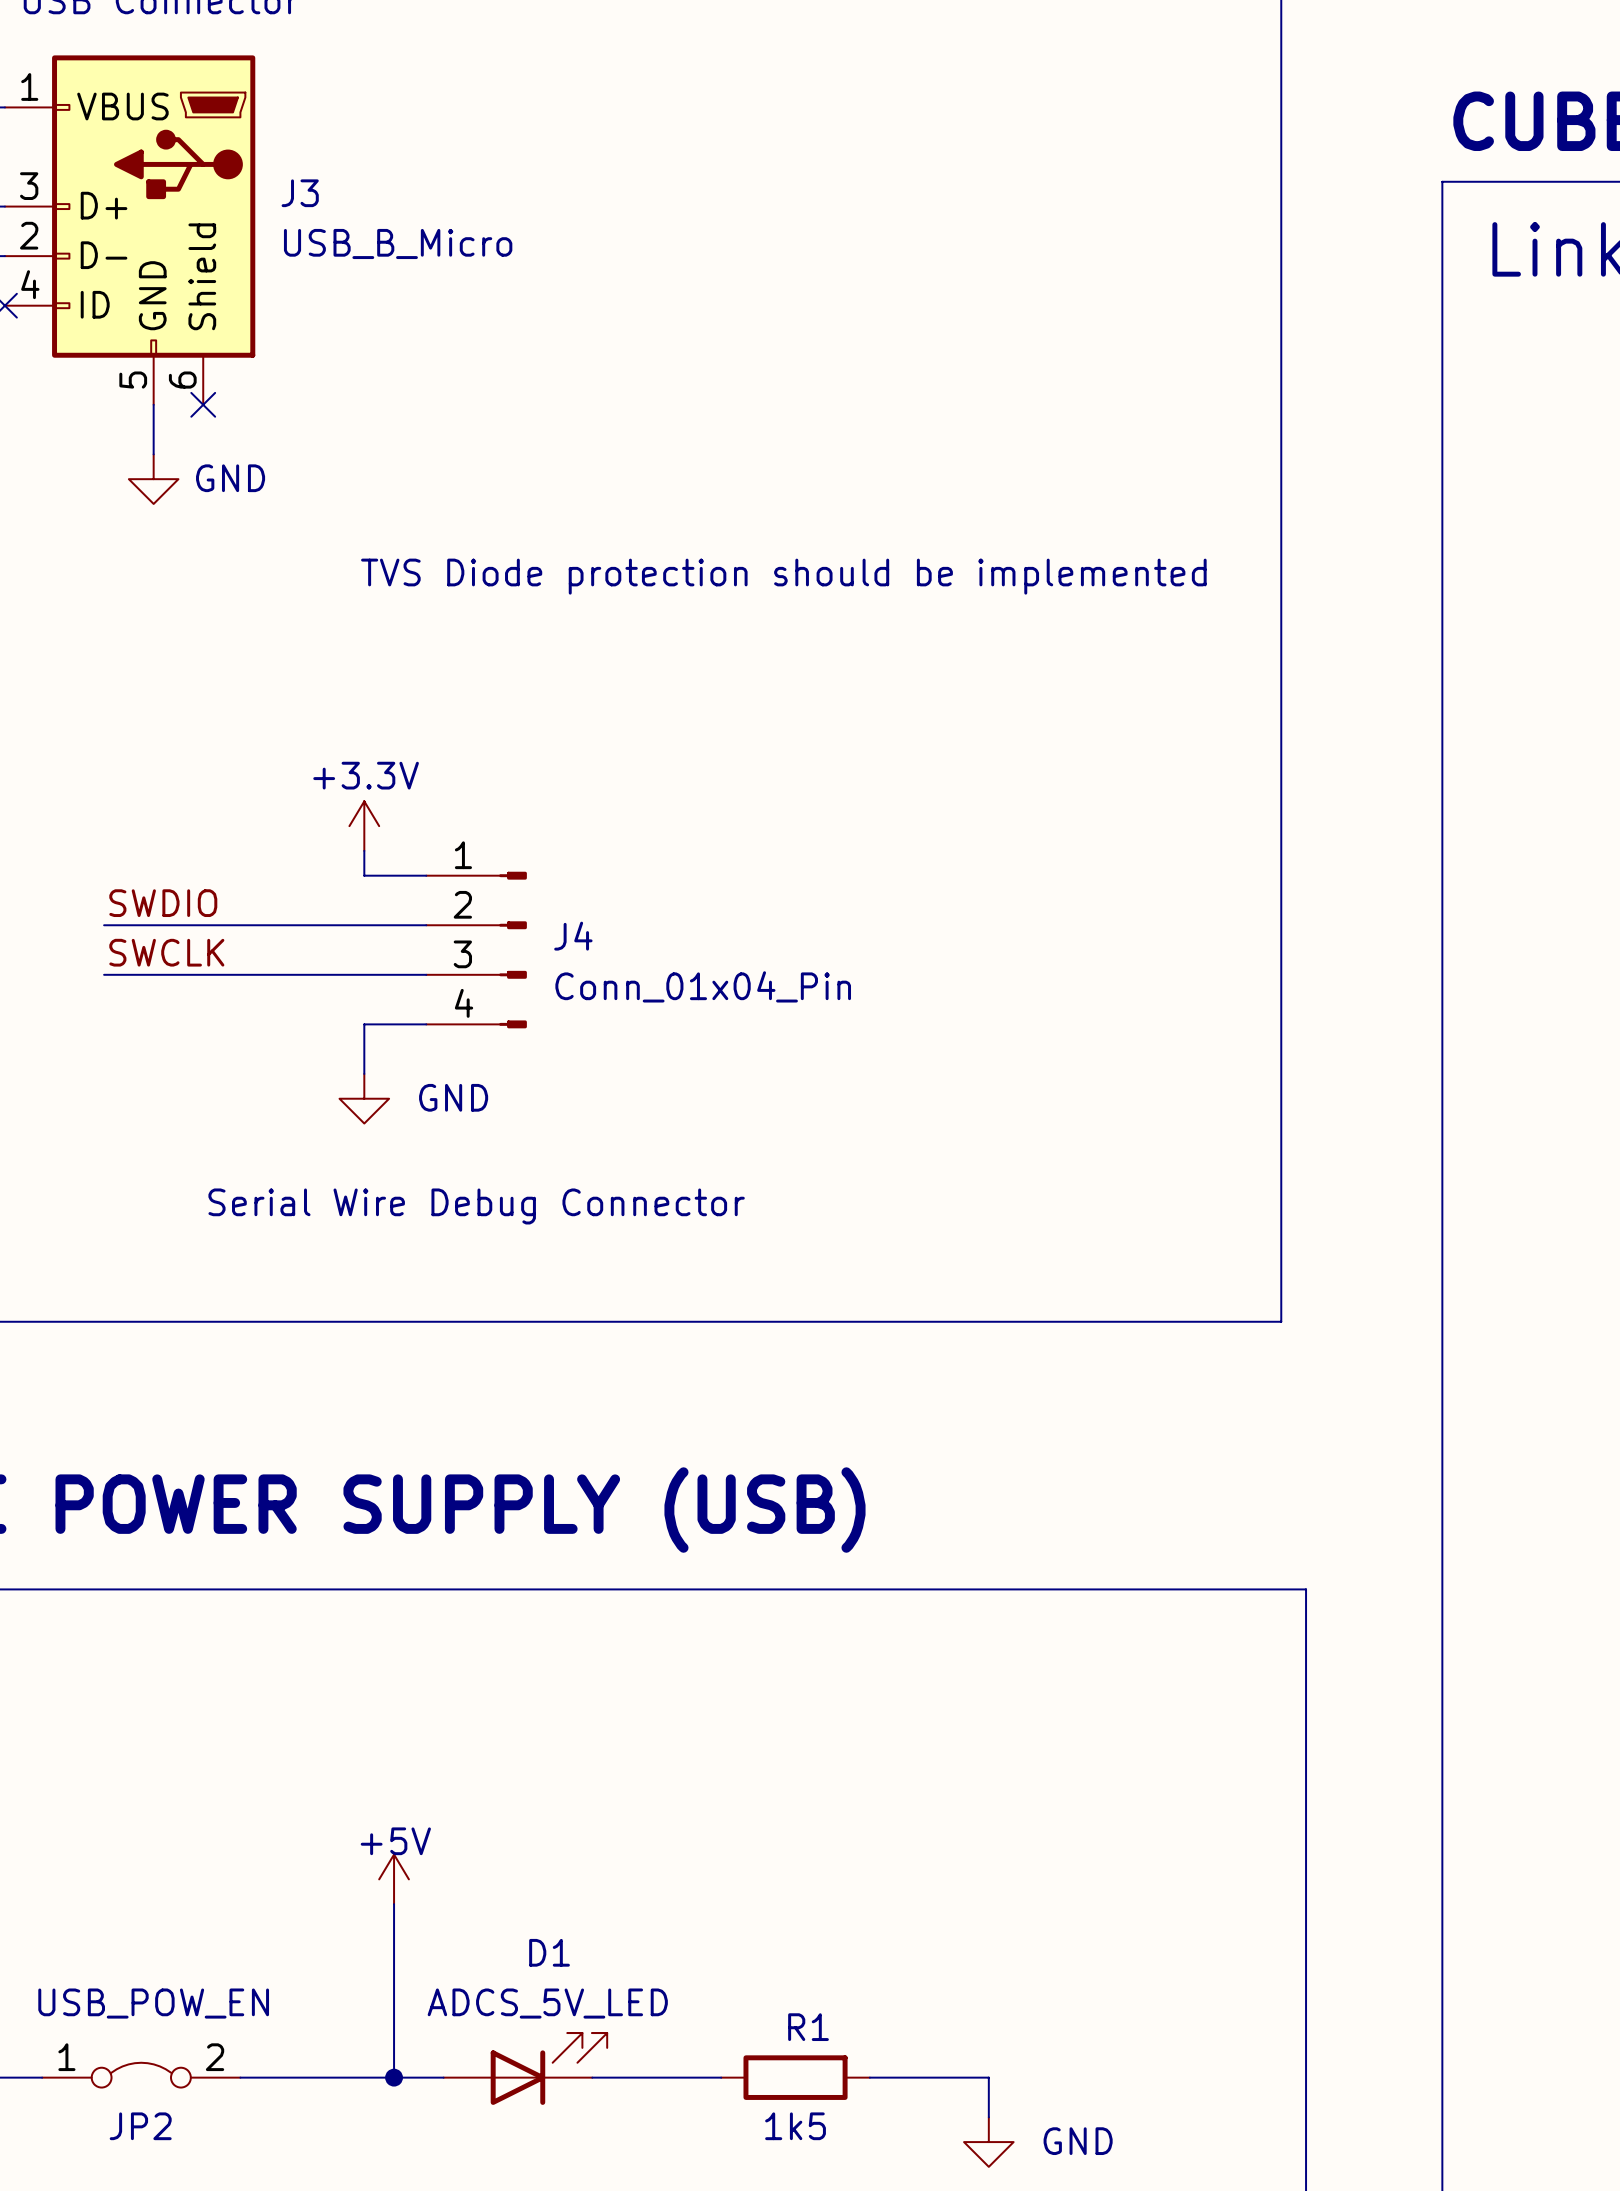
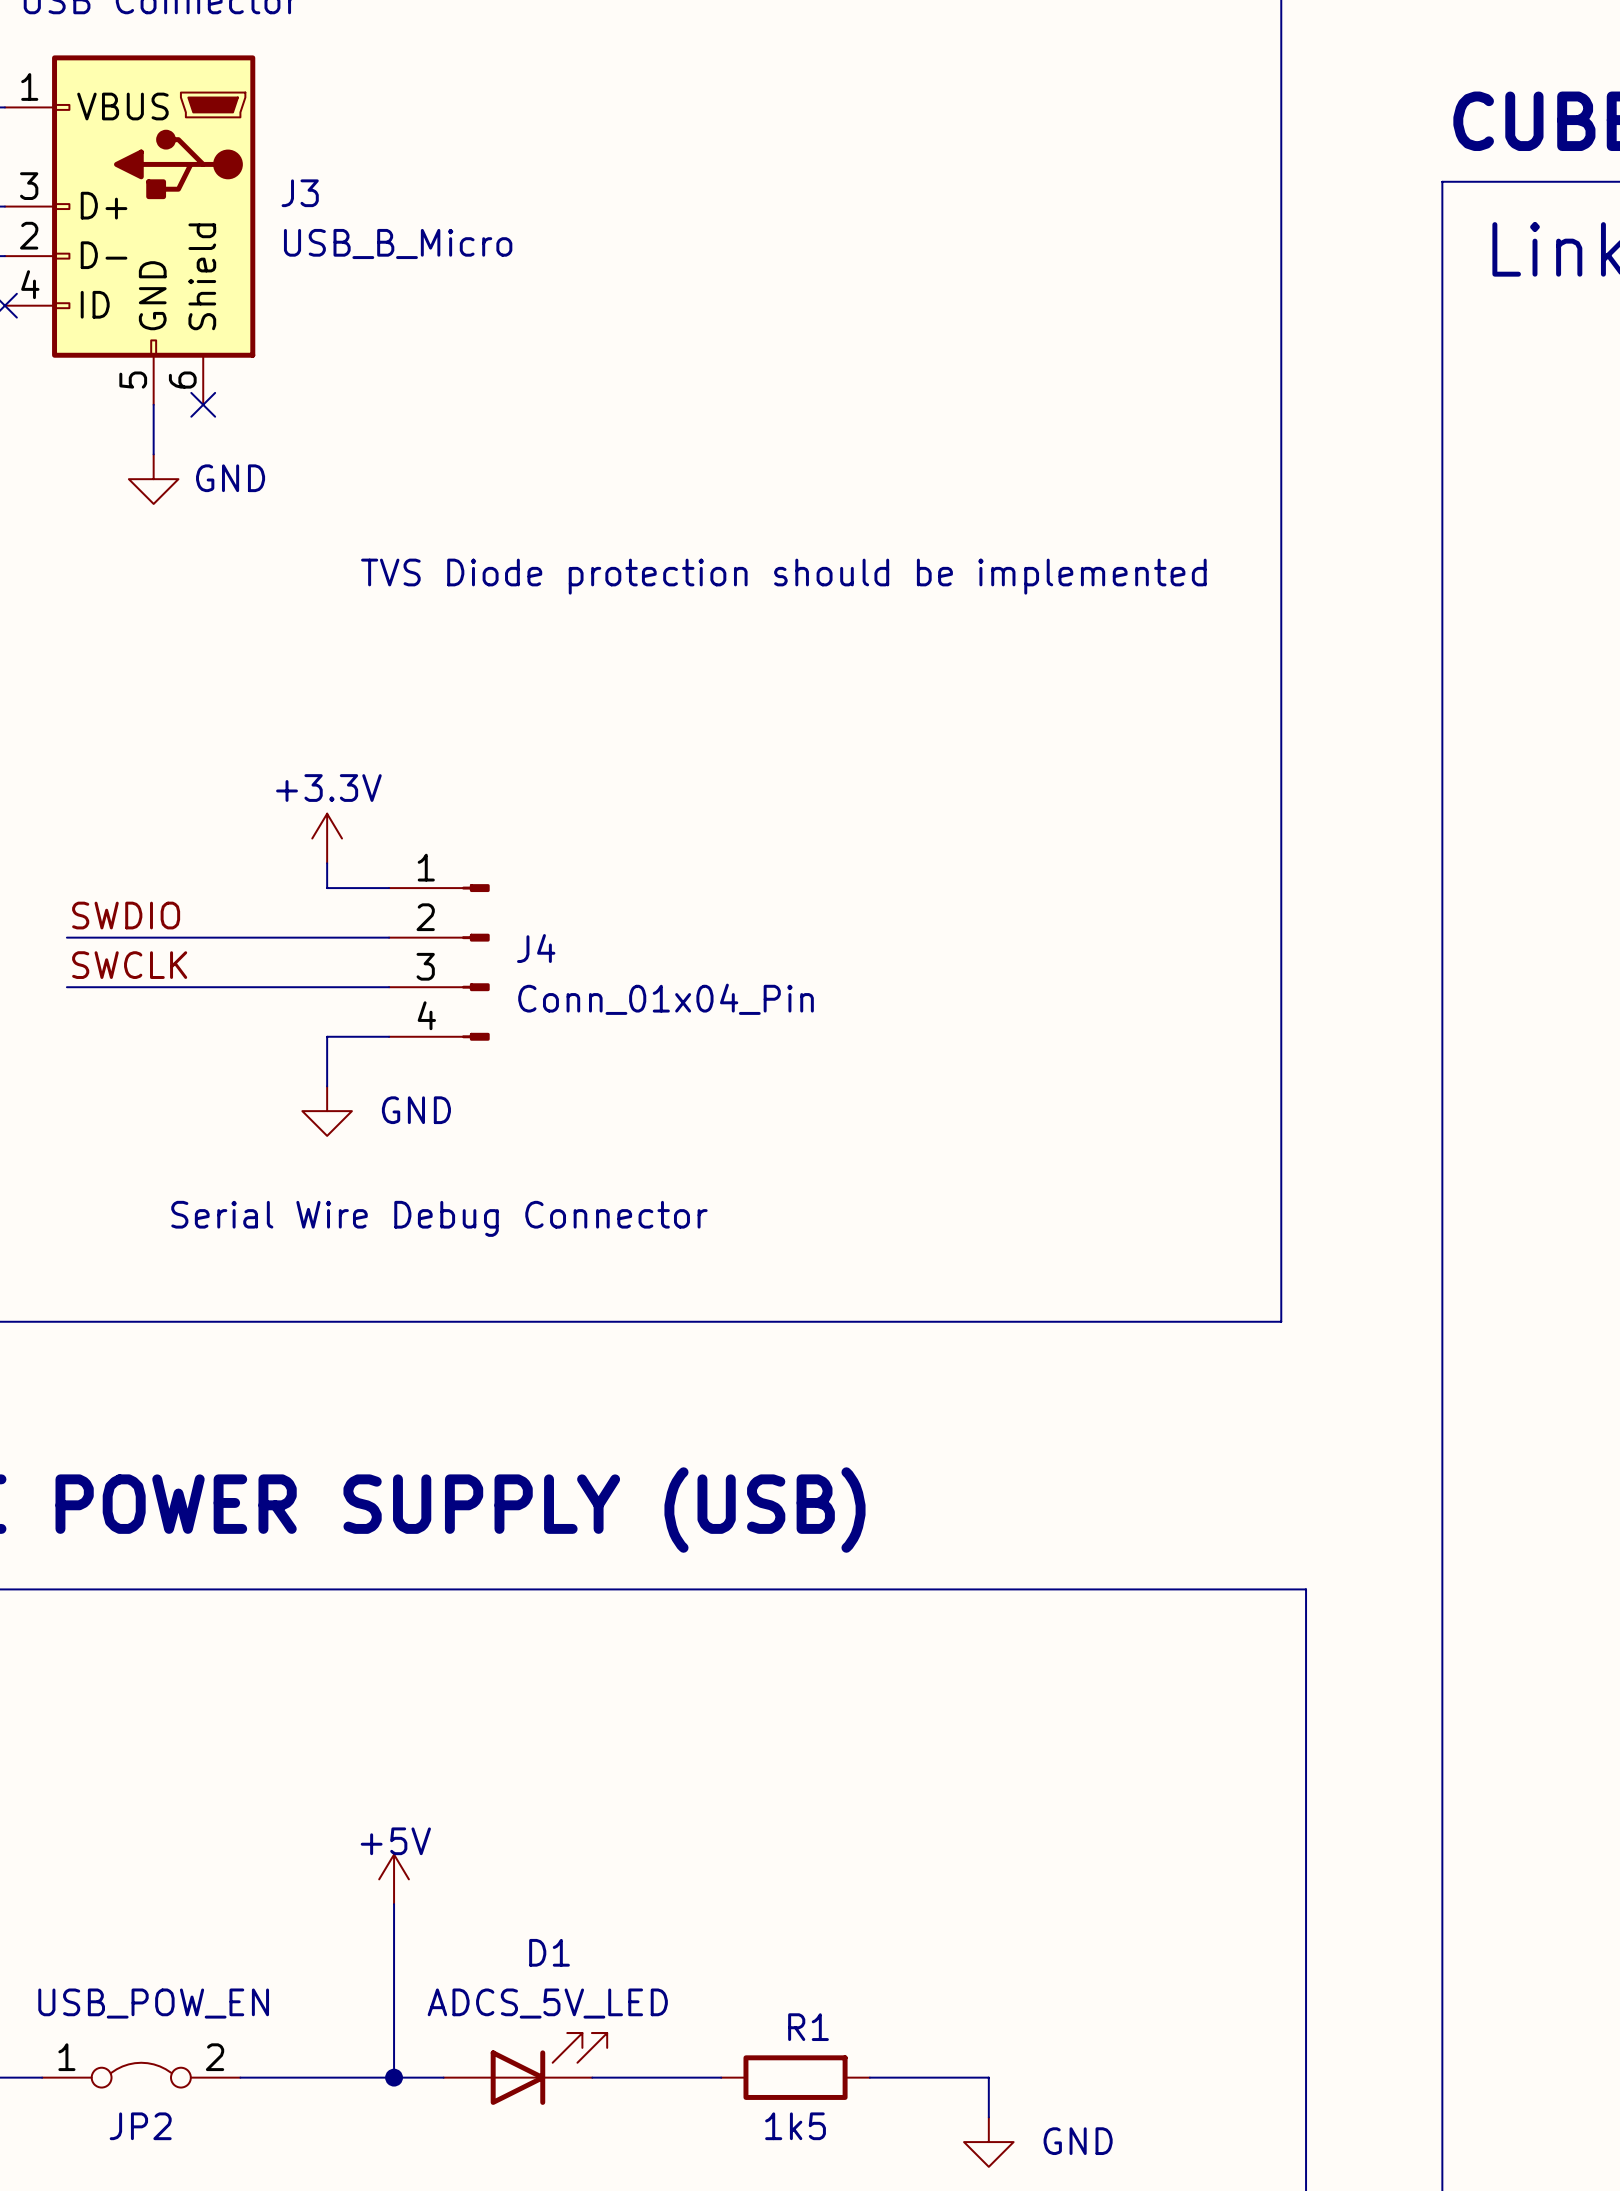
power symbol position: +3.3V (364, 826) -> +3.3V (327, 838)
wire: (364, 850) (364, 875) (426, 875) -> (327, 863) (327, 888) (389, 888)
label position: SWDIO (163, 903) -> SWDIO (126, 915)
wire: (104, 925) (426, 925) -> (66, 937) (389, 937)
J4 position: (476, 950) -> (439, 962)
label position: SWCLK (166, 952) -> SWCLK (129, 965)
wire: (104, 974) (426, 974) -> (66, 987) (389, 987)
wire: (426, 1024) (364, 1024) (364, 1073) -> (389, 1036) (327, 1036) (327, 1086)
power symbol position: GND (364, 1098) -> GND (327, 1111)
text position: Serial Wire Debug Connector (476, 1206) -> Serial Wire Debug Connector (439, 1218)

